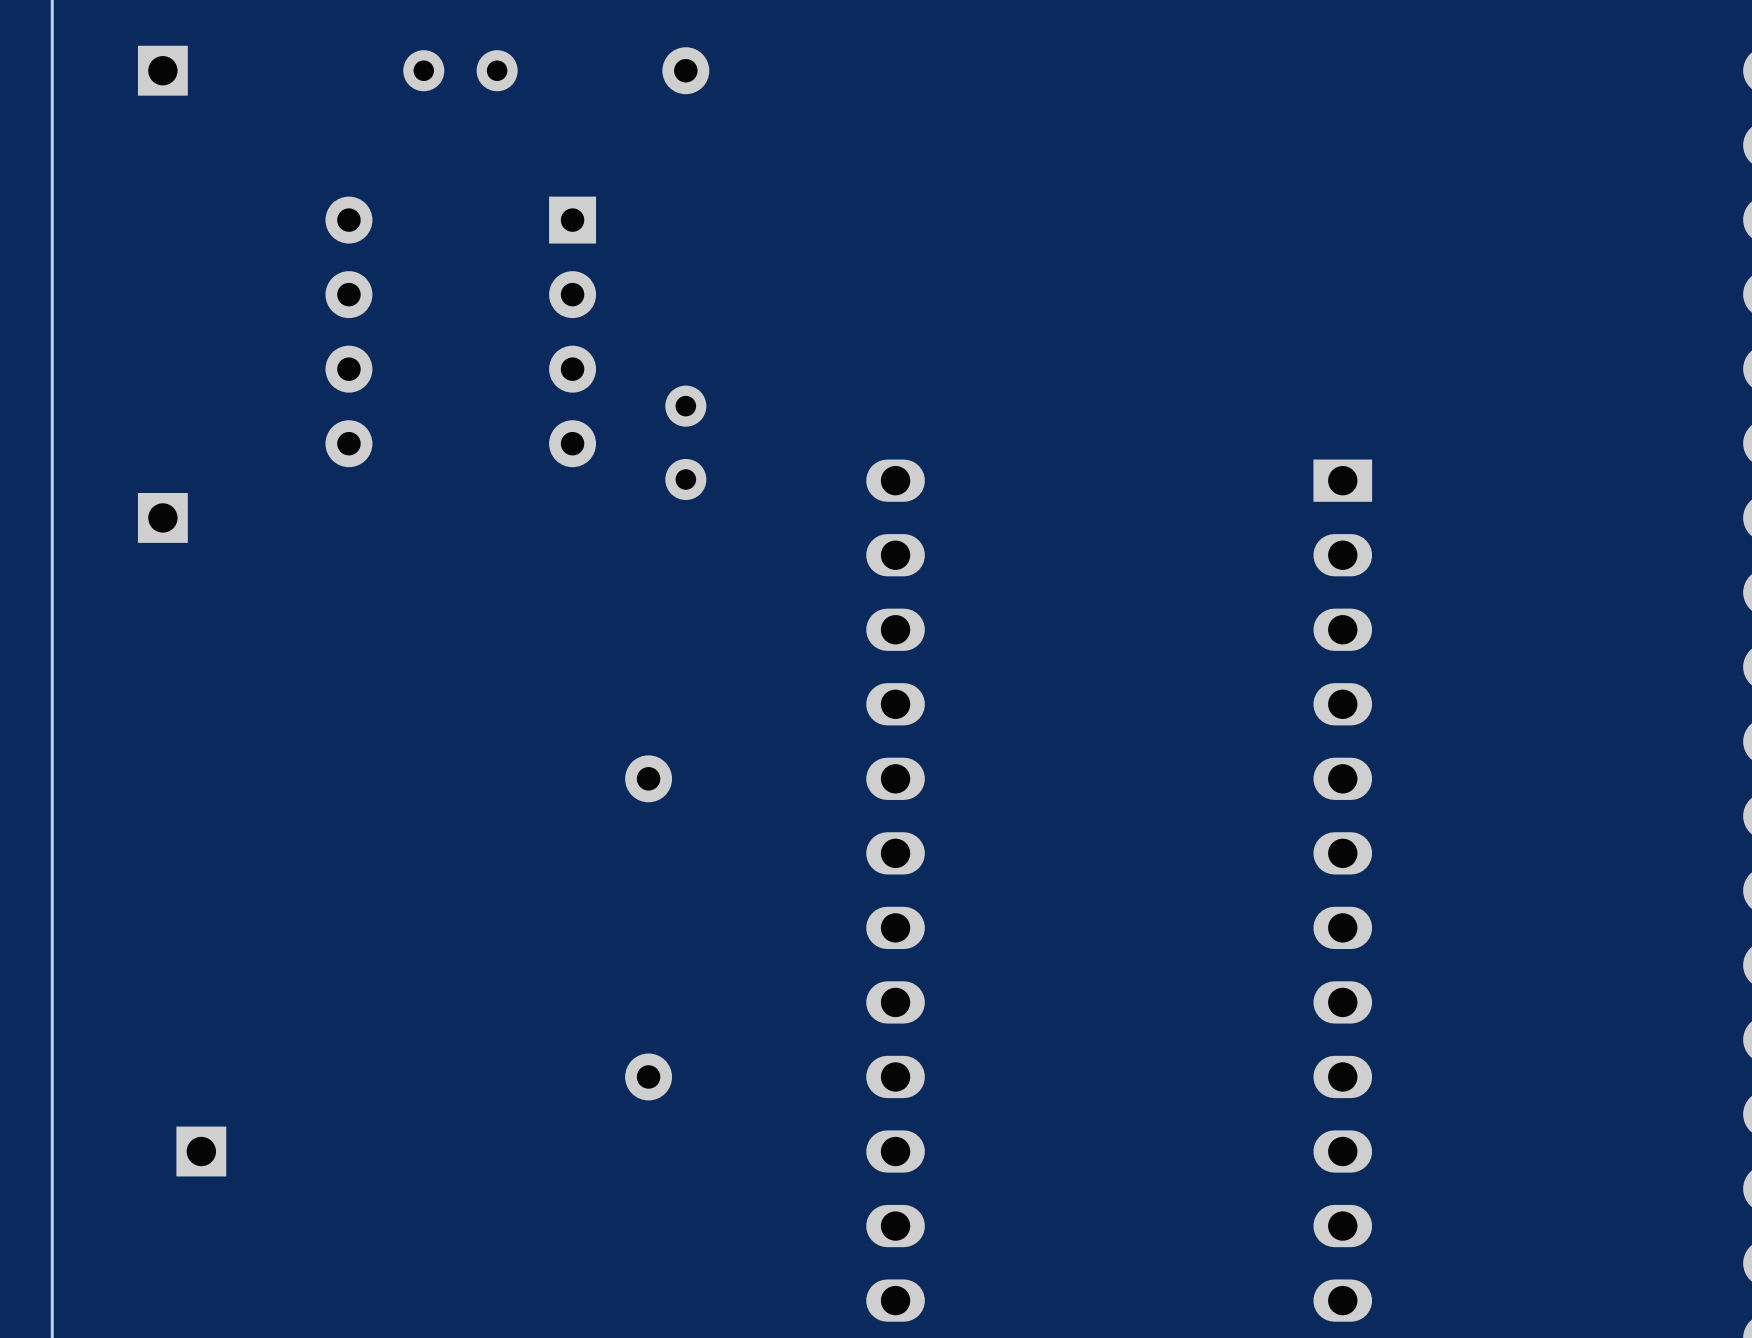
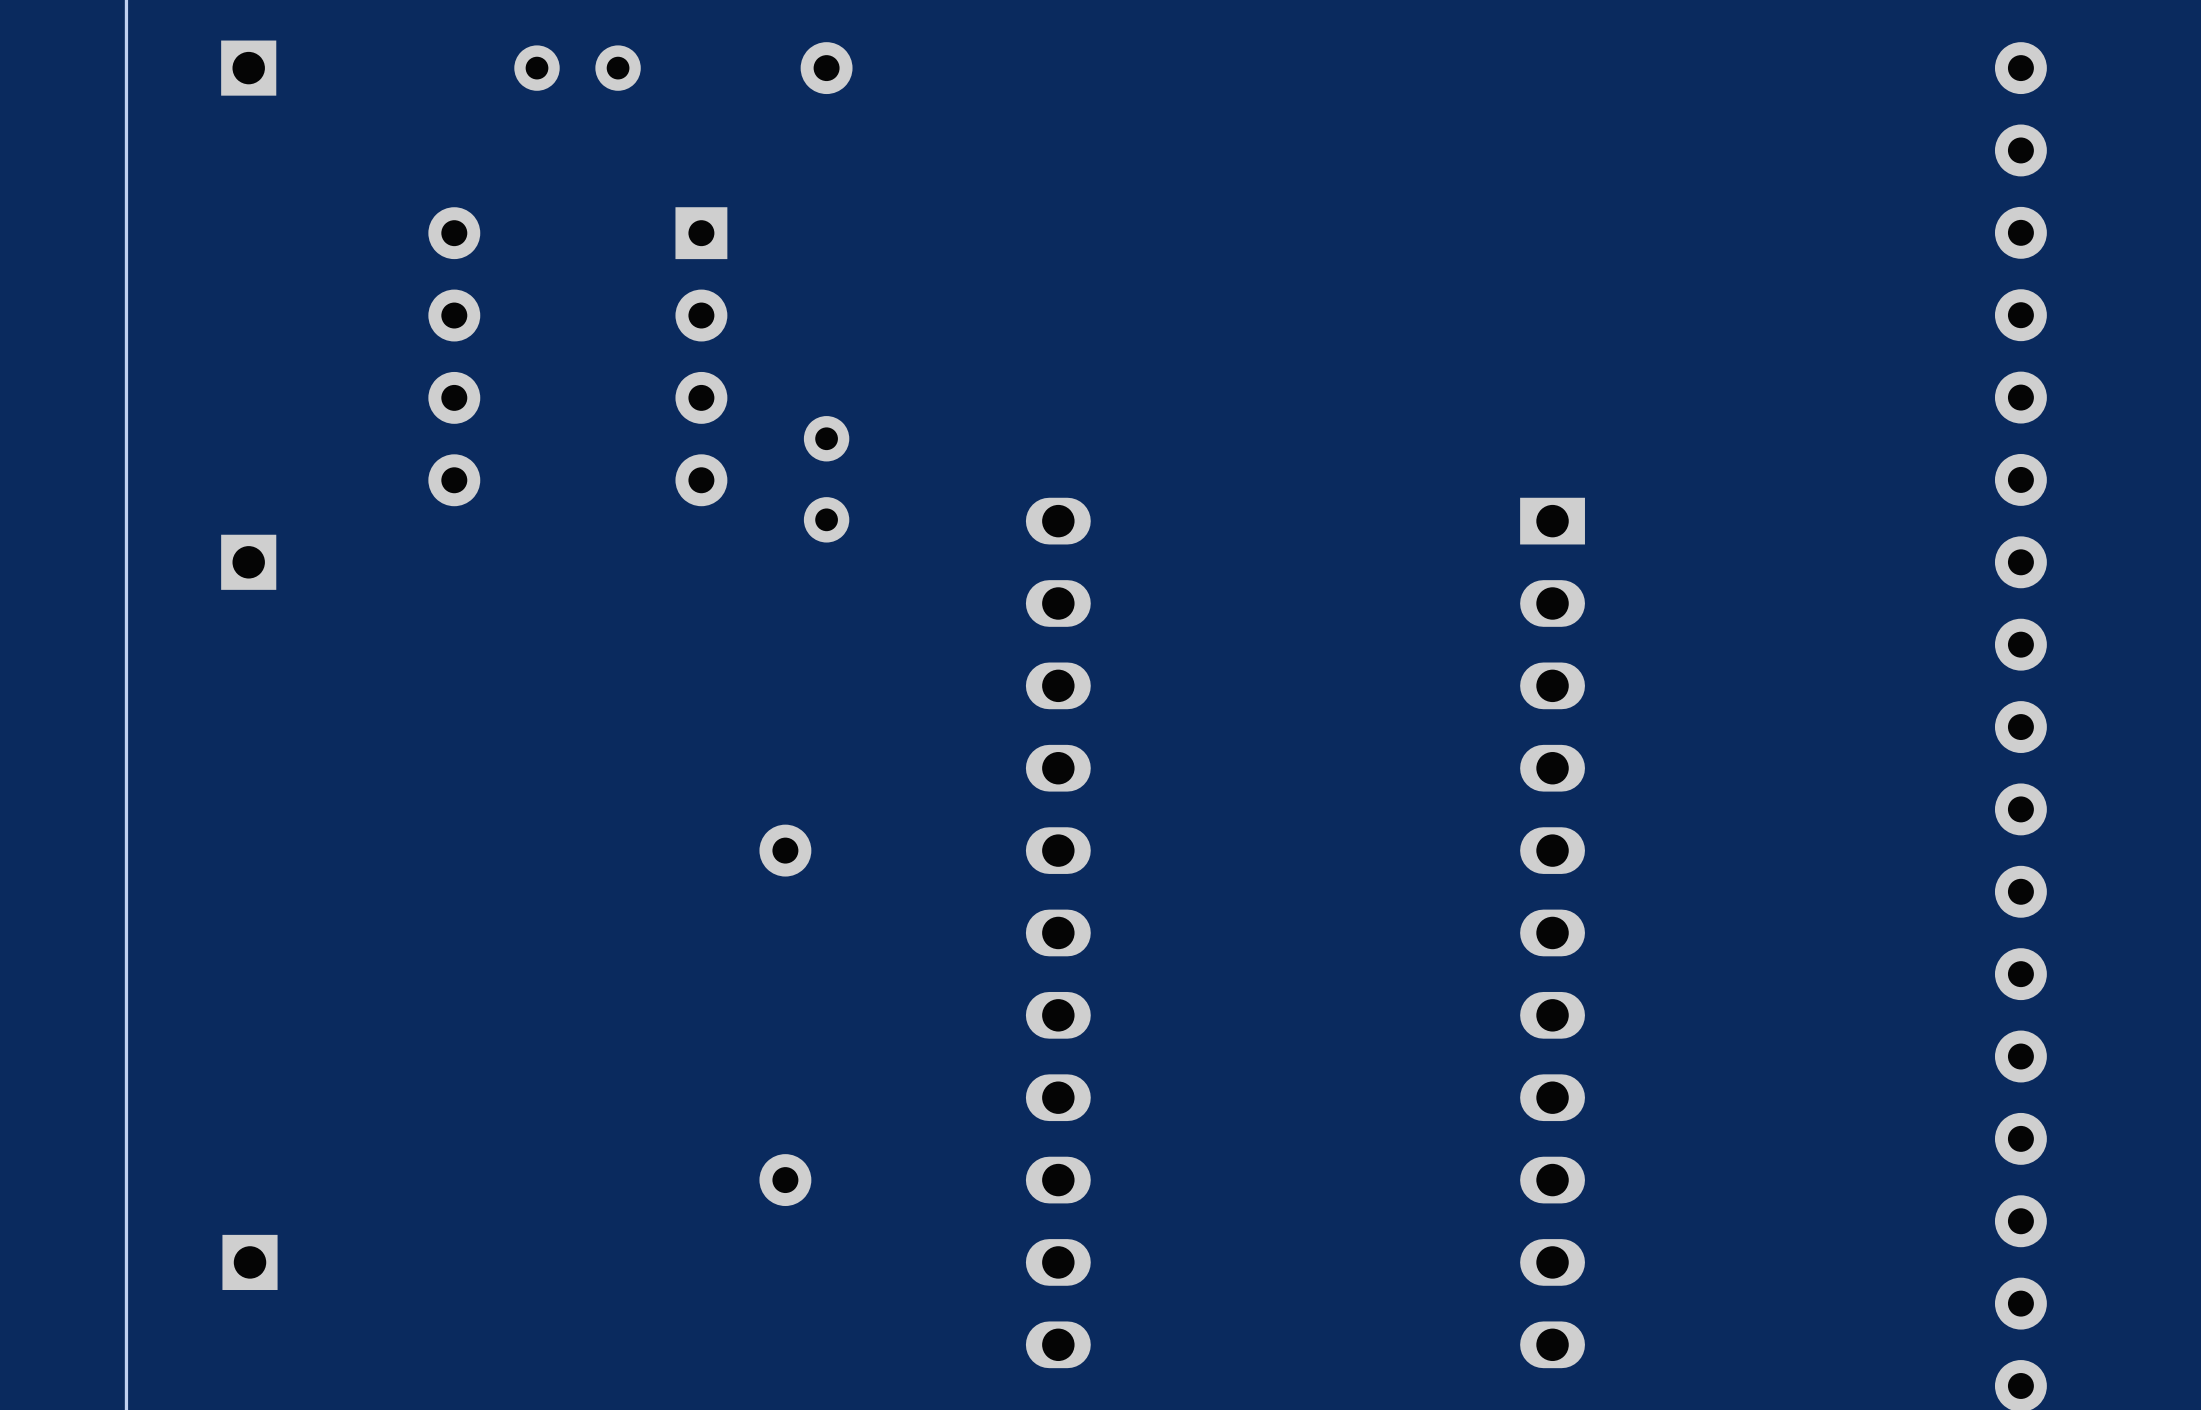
part position: (201, 1151) -> (250, 1262)

